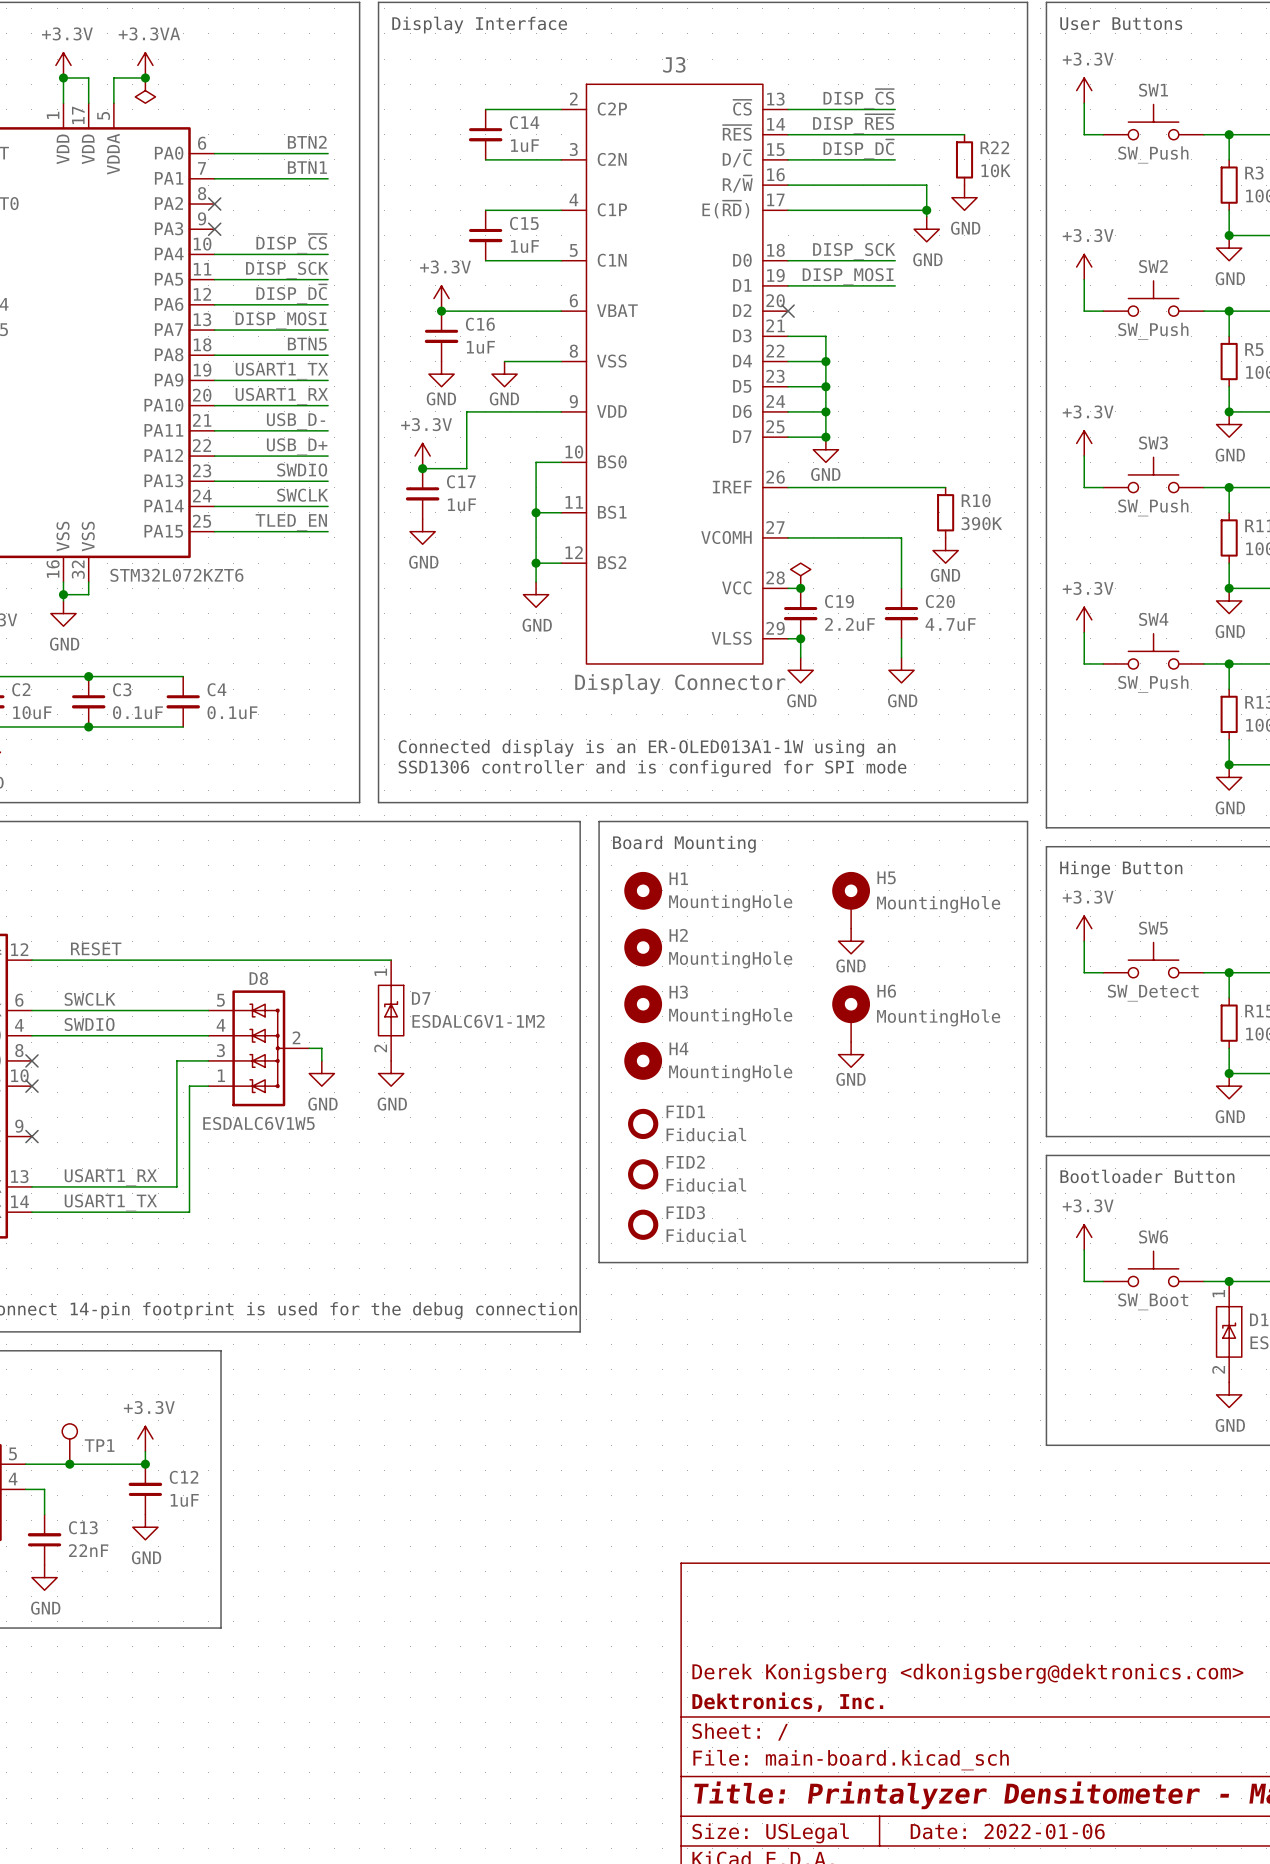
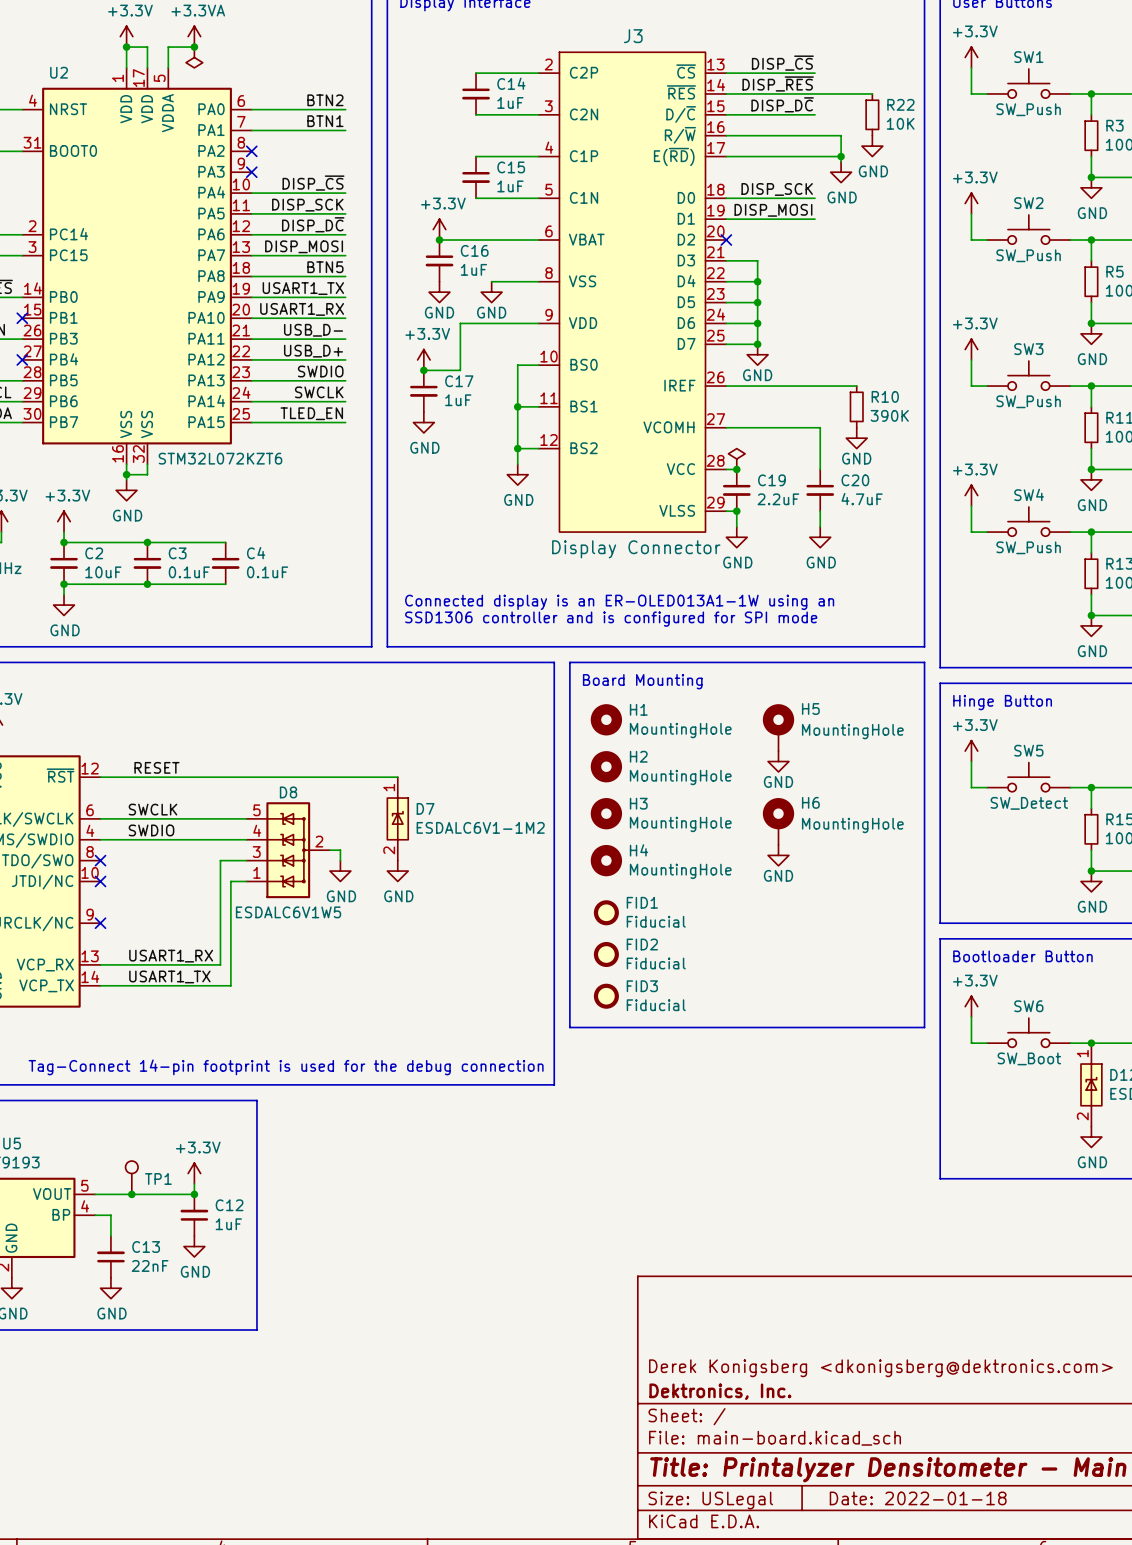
title block: Date: 2022-01-06 (1007, 1831) -> Date: 2022-01-18 (918, 1498)

